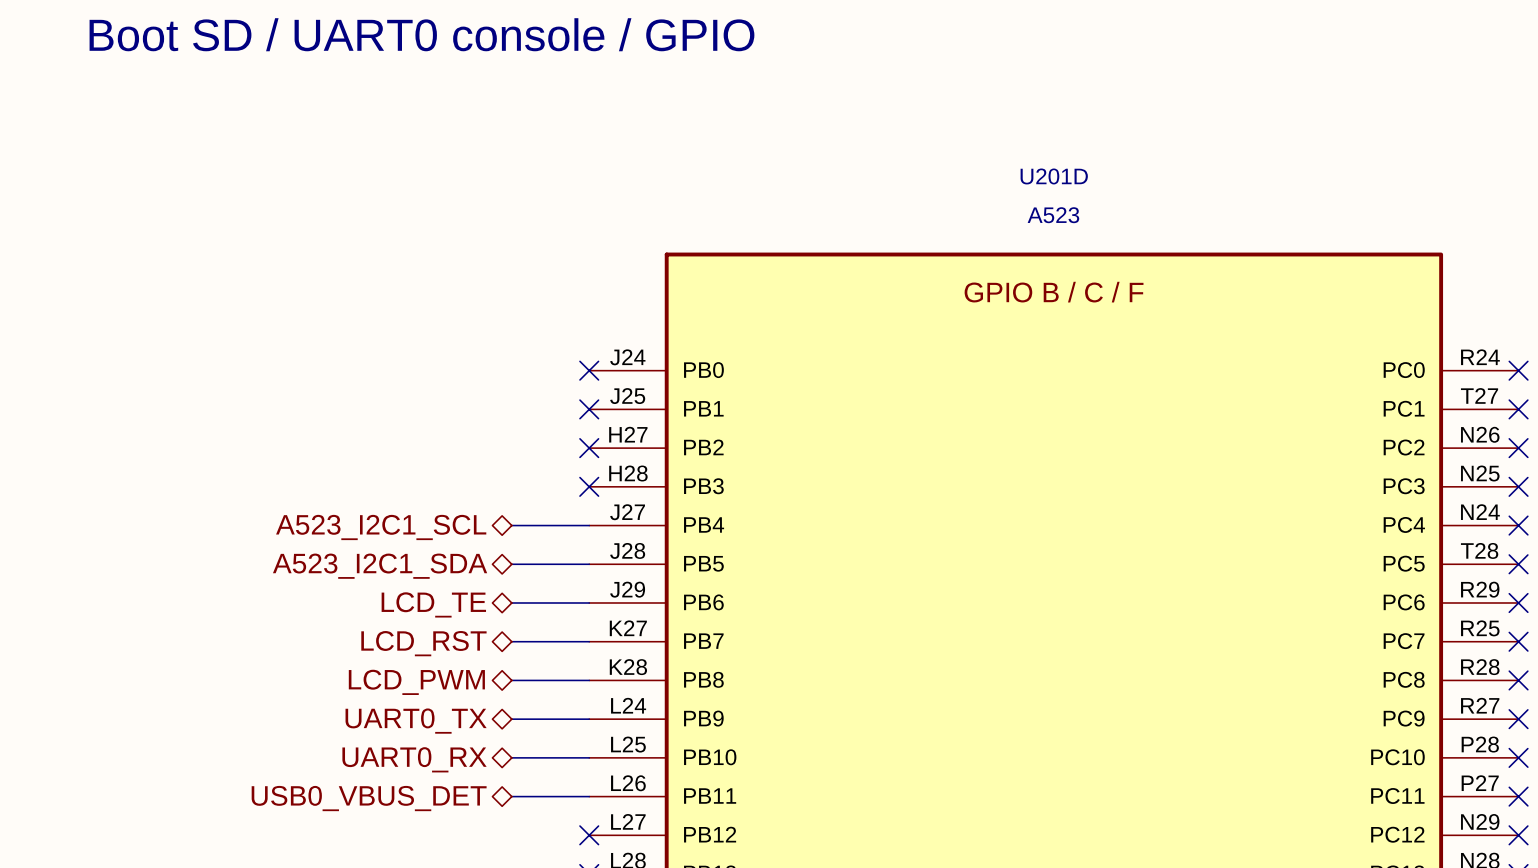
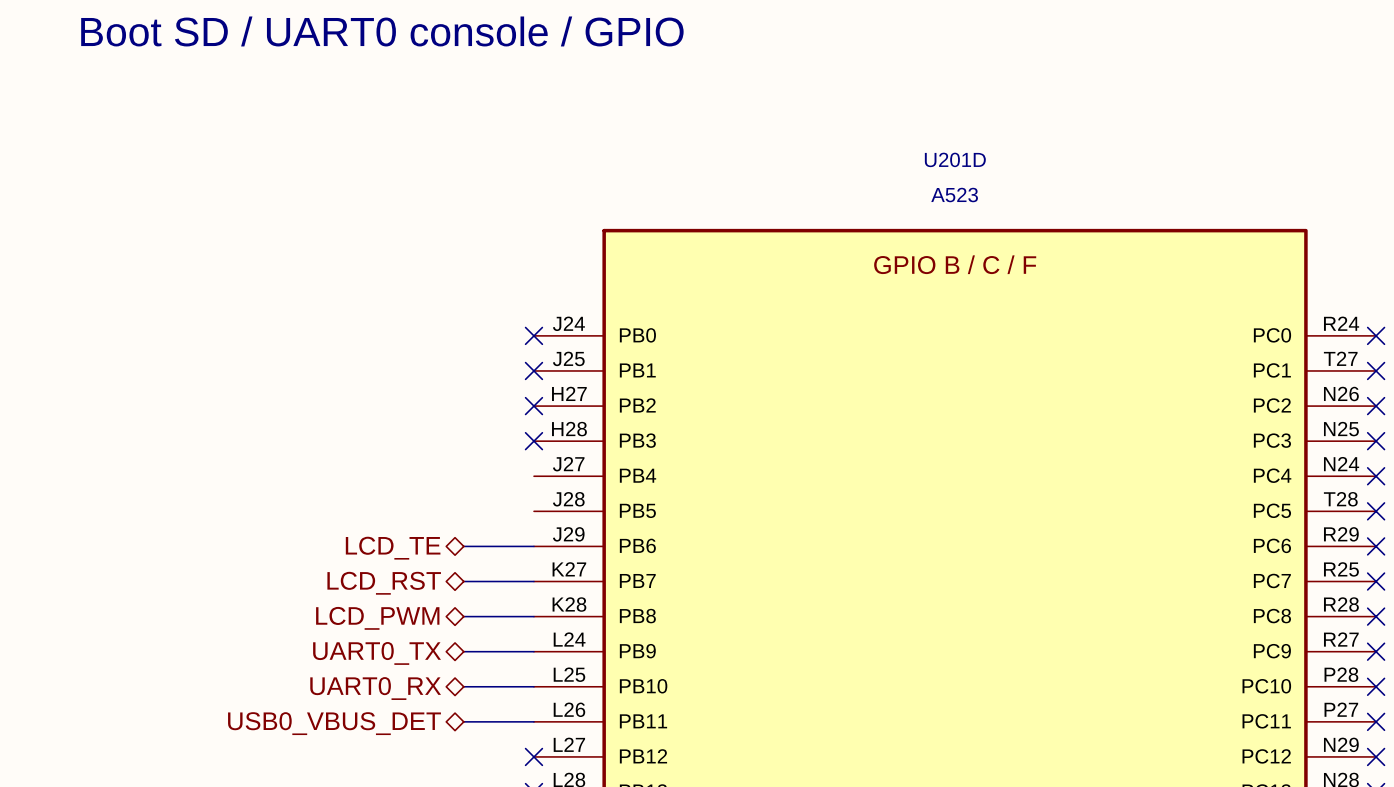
wire: (511, 525) (589, 525) -> none
hierarchical label: A523_I2C1_SCL (381, 527) -> none
wire: (511, 564) (589, 564) -> none
hierarchical label: A523_I2C1_SDA (380, 566) -> none

